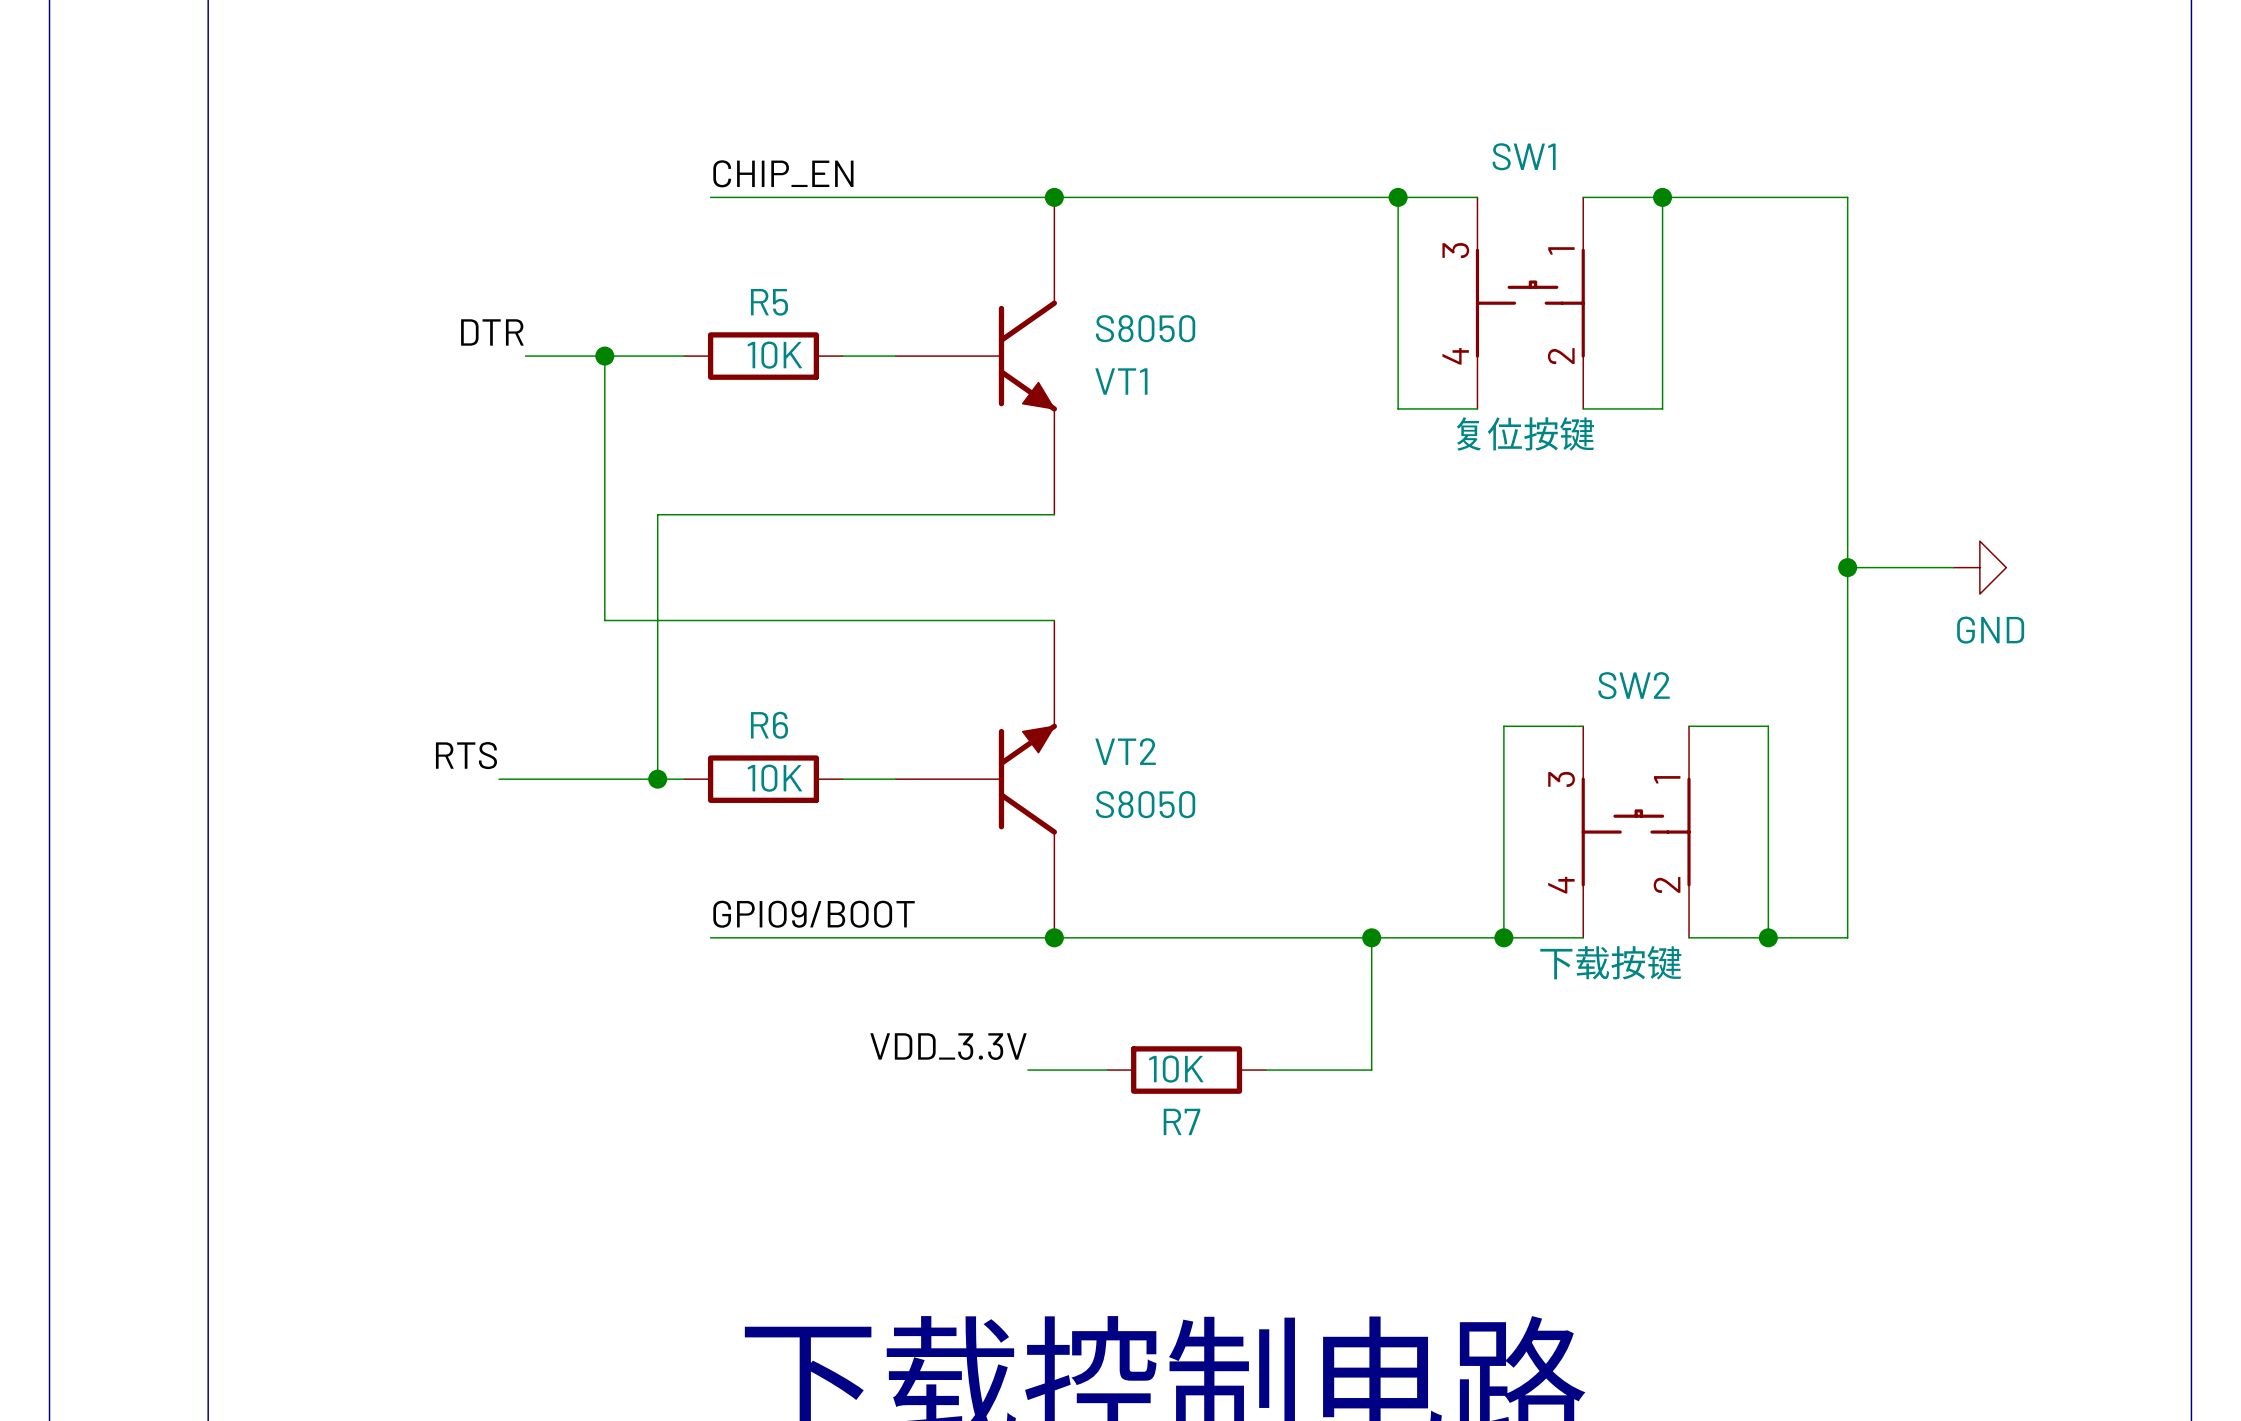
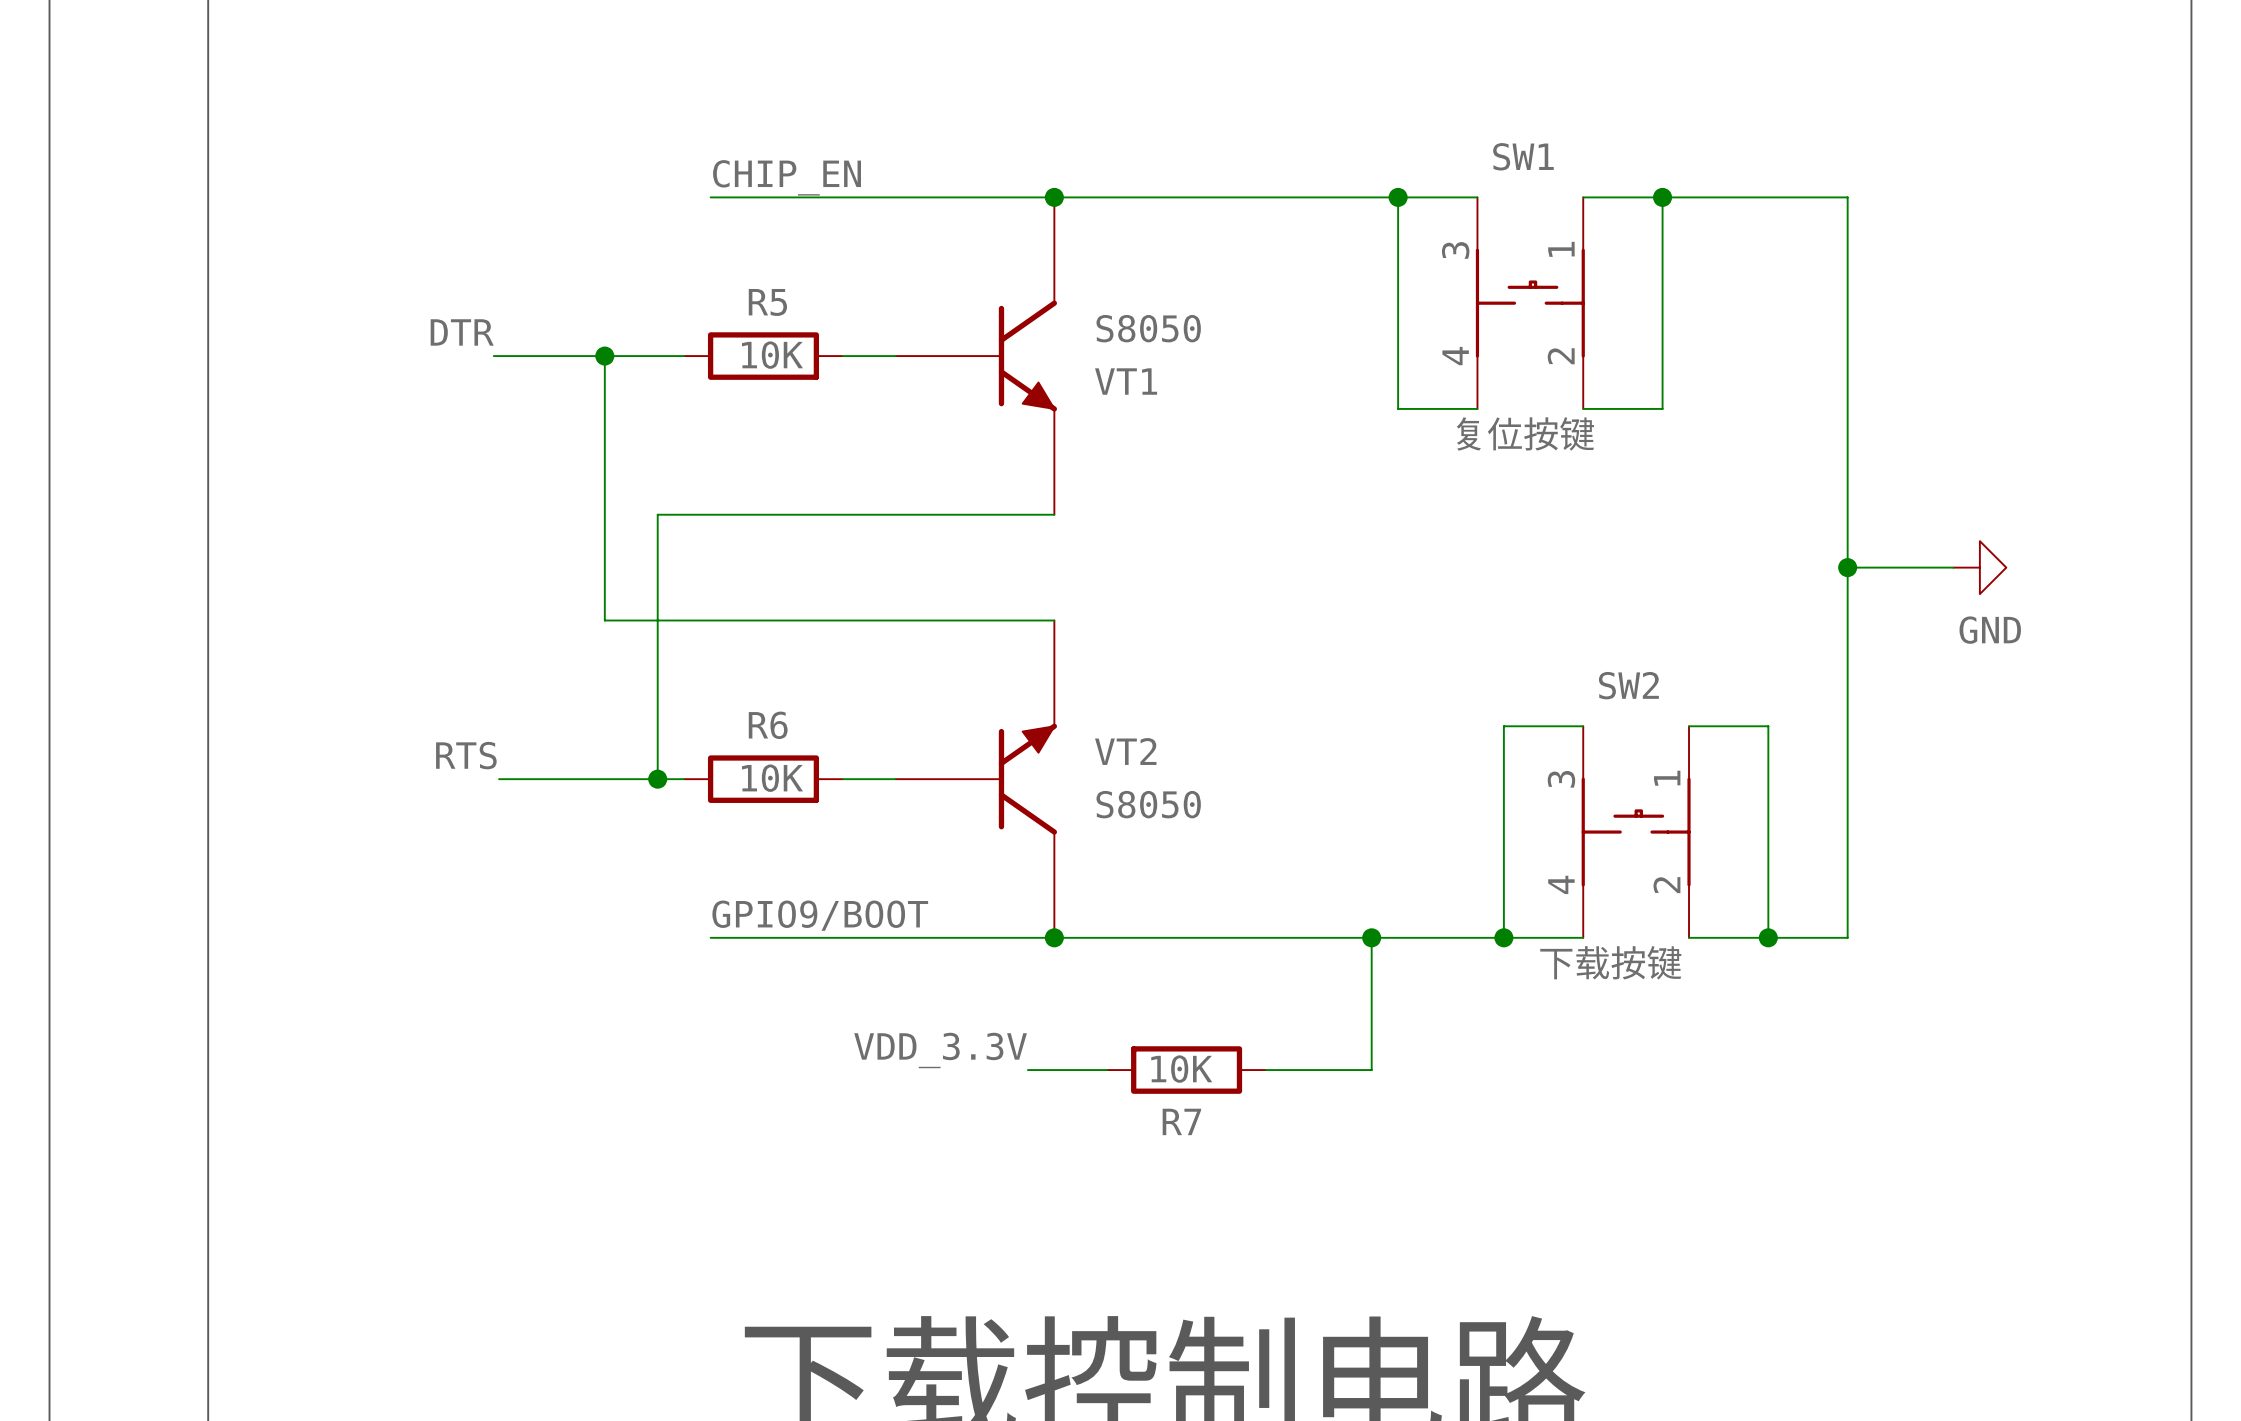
label position: DTR (492, 332) -> DTR (462, 332)
wire: none -> (493, 356) (525, 356)

